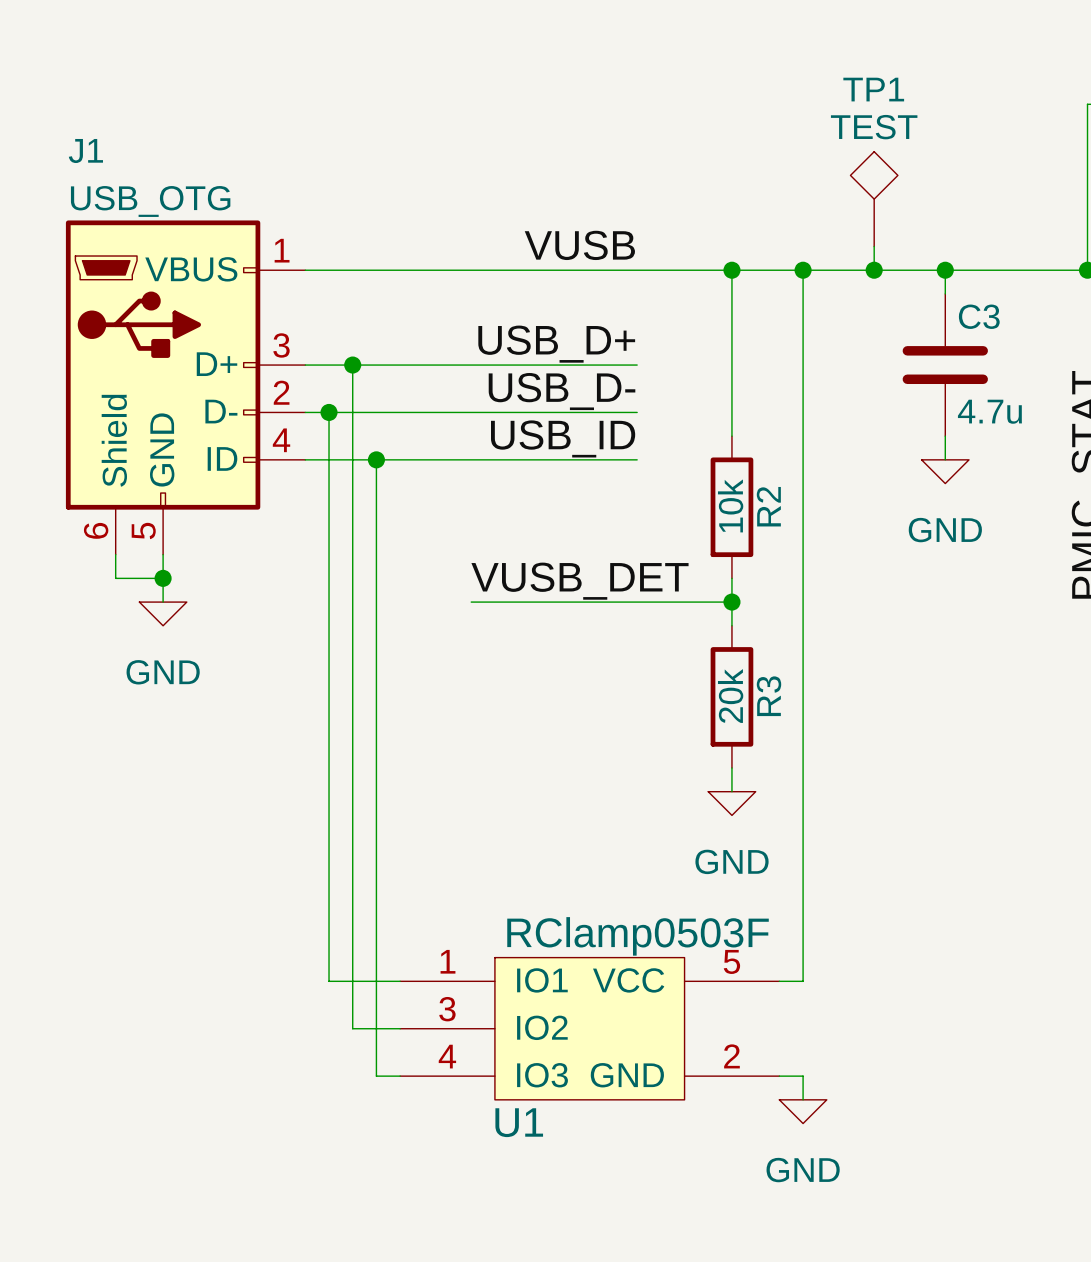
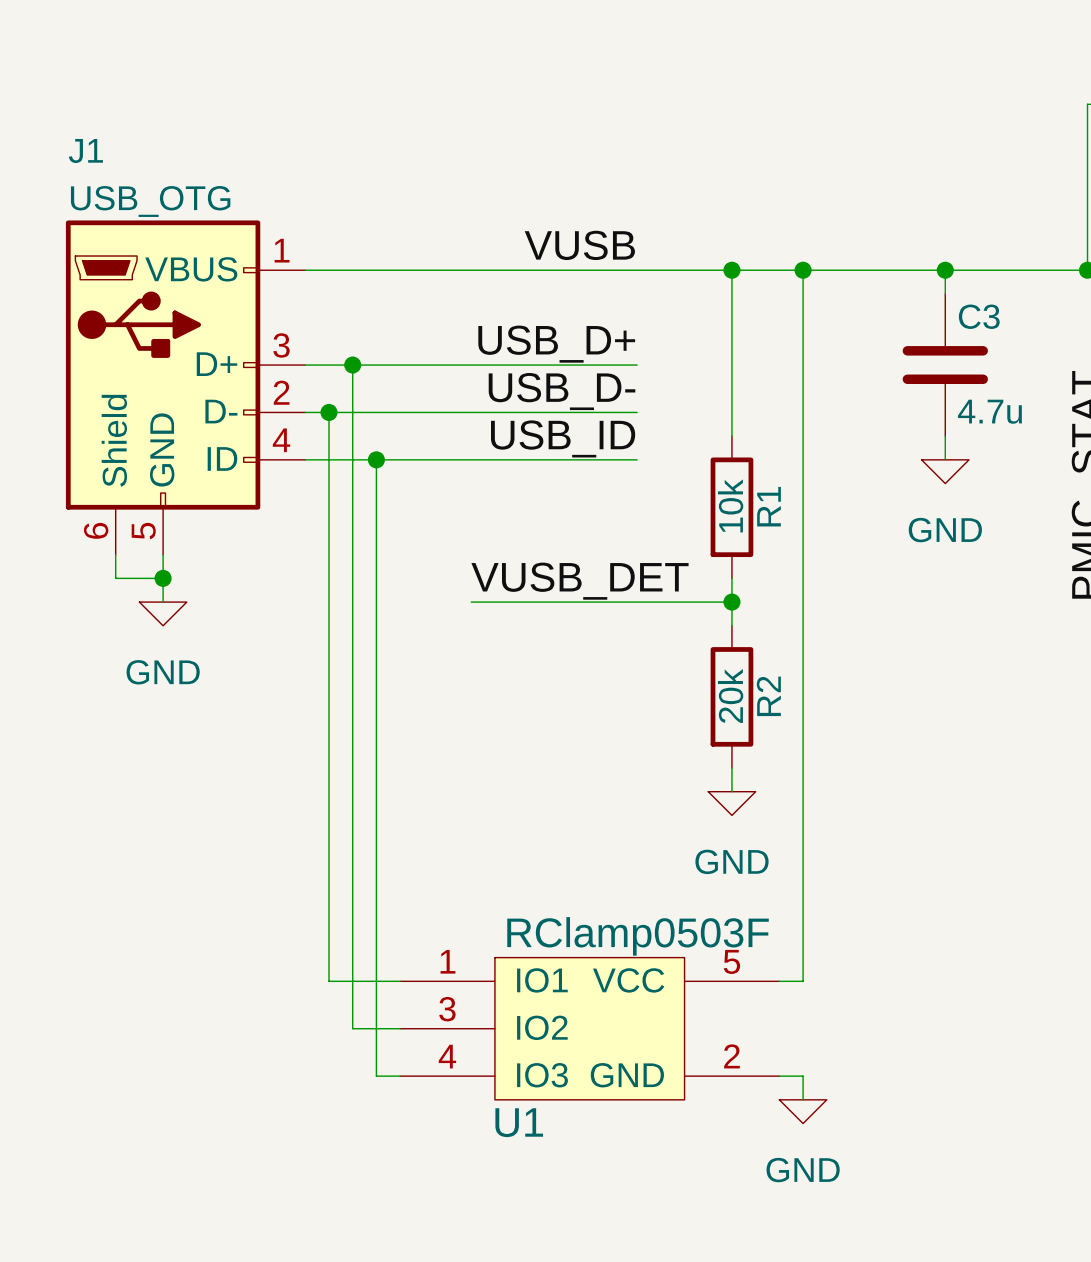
TP1: TEST (874, 199) -> none
wire: (874, 246) (874, 270) -> none
junction: (874, 270) -> none
R2 name: R2 (768, 506) -> R1 (769, 506)
R3 name: R3 (768, 696) -> R2 (768, 696)

